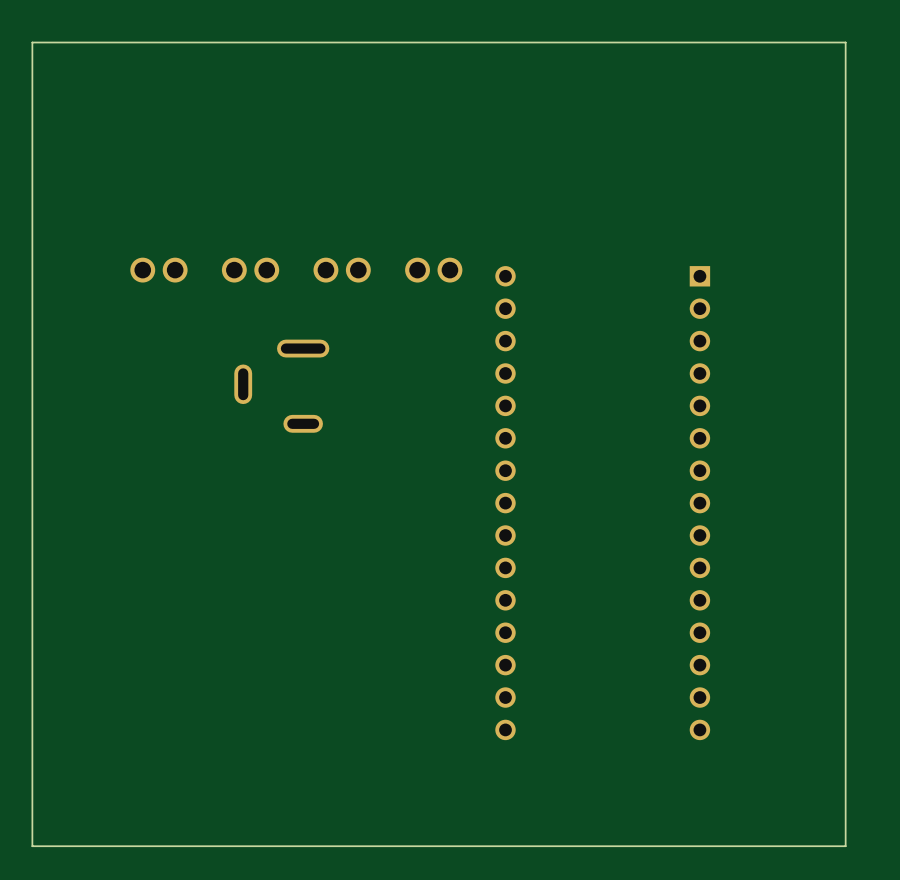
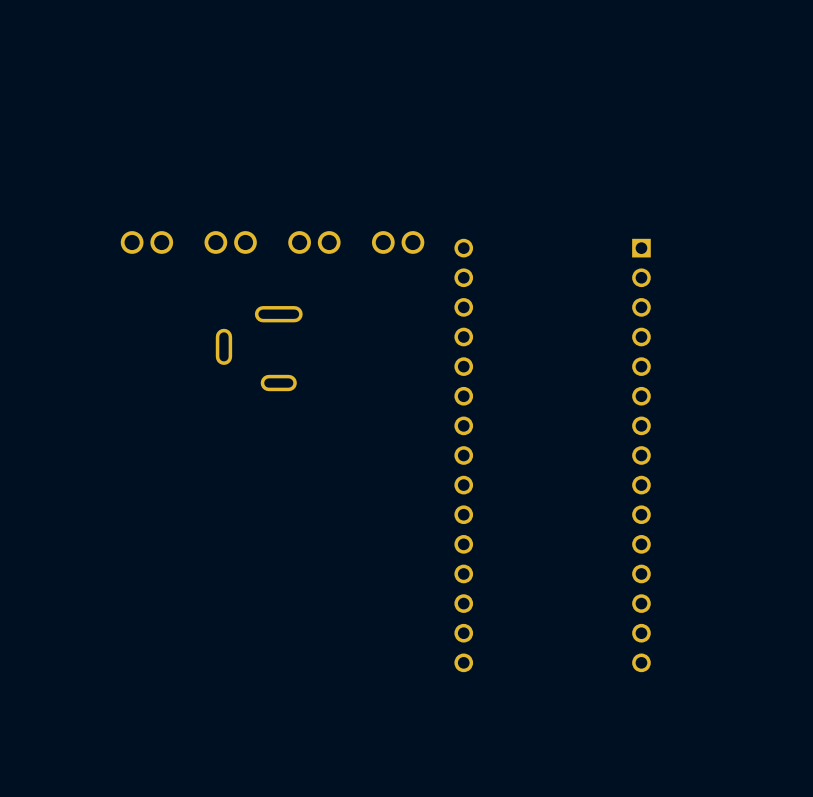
board edge: (845, 42) (32, 42) (32, 846) (845, 846) (845, 42) -> none

